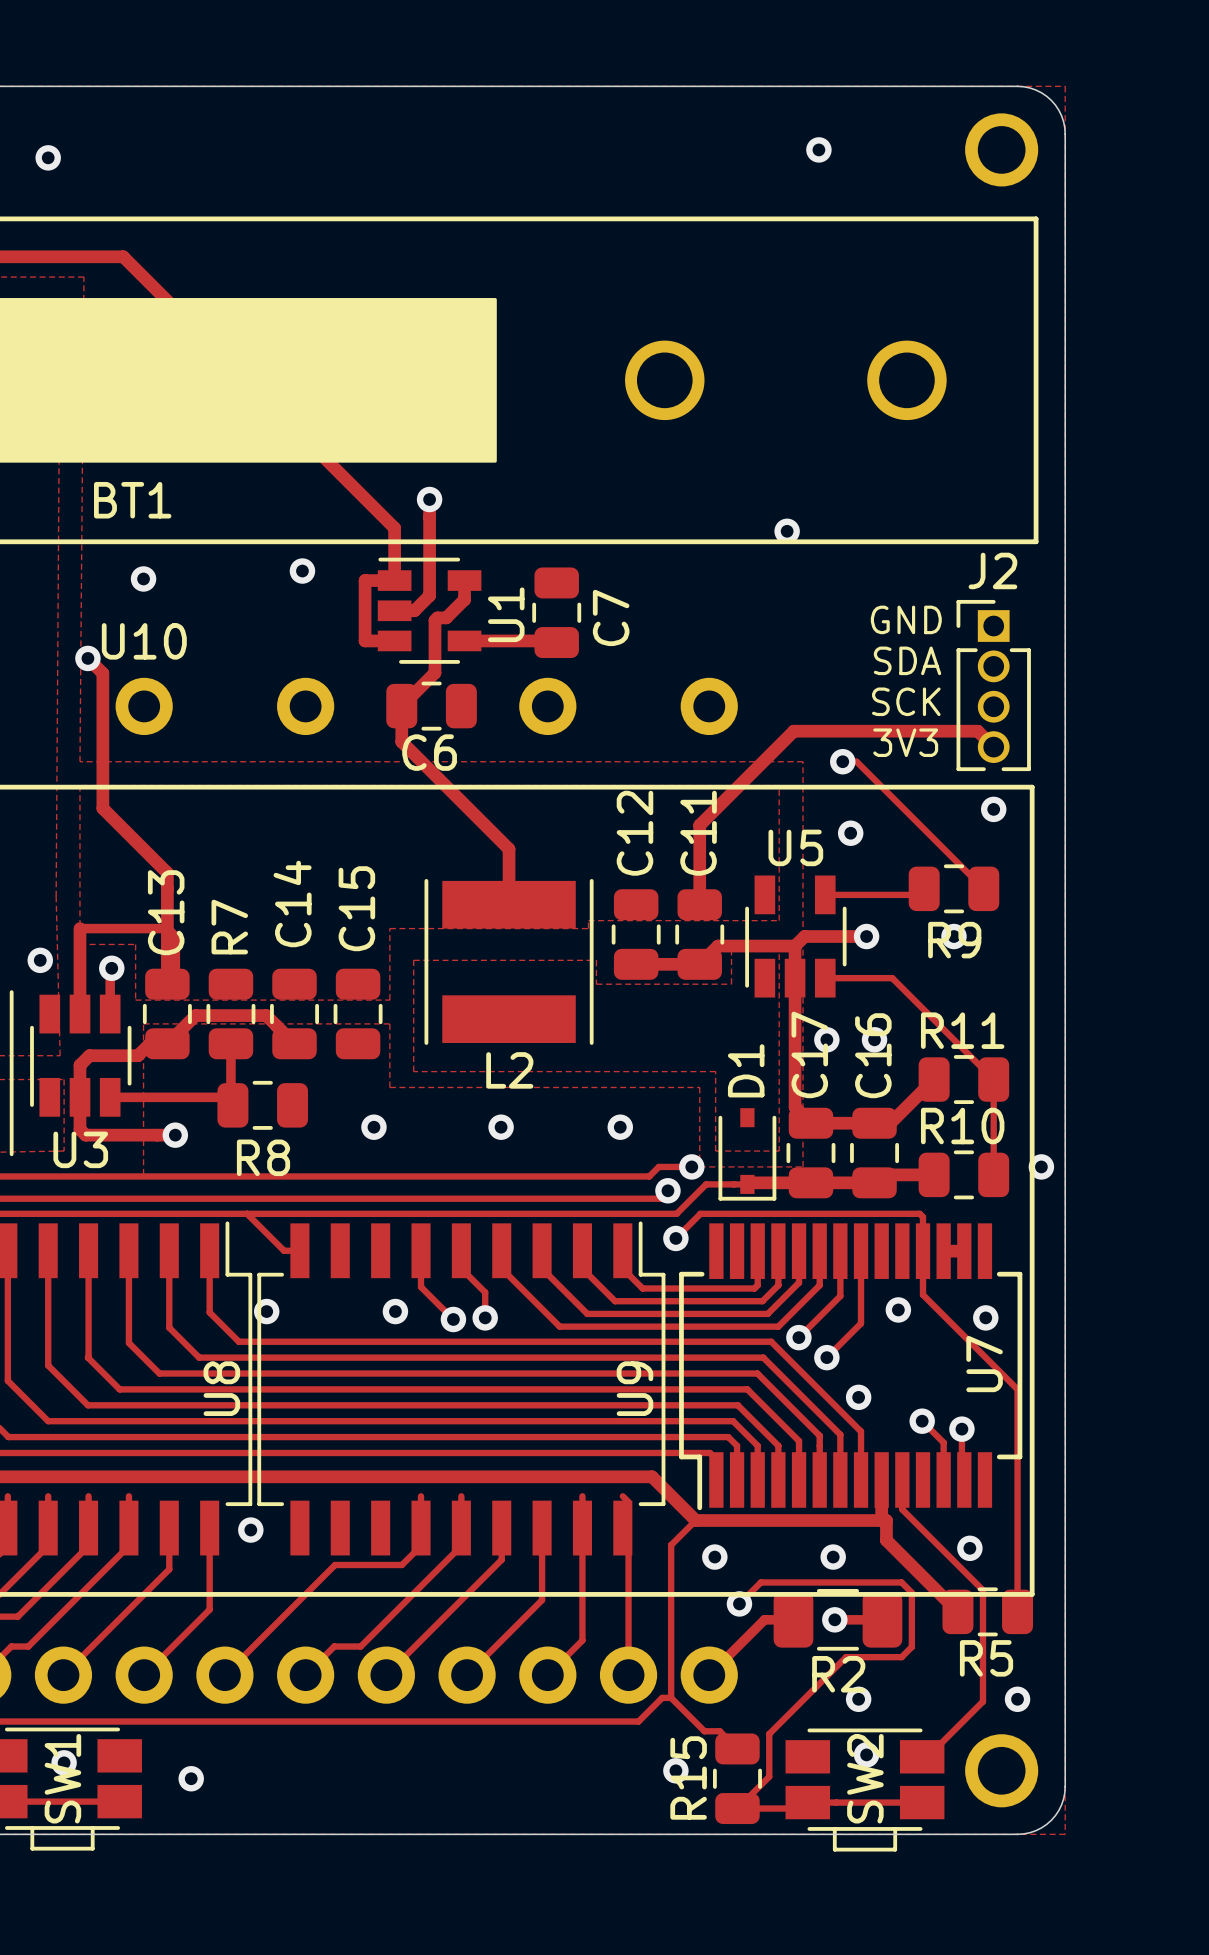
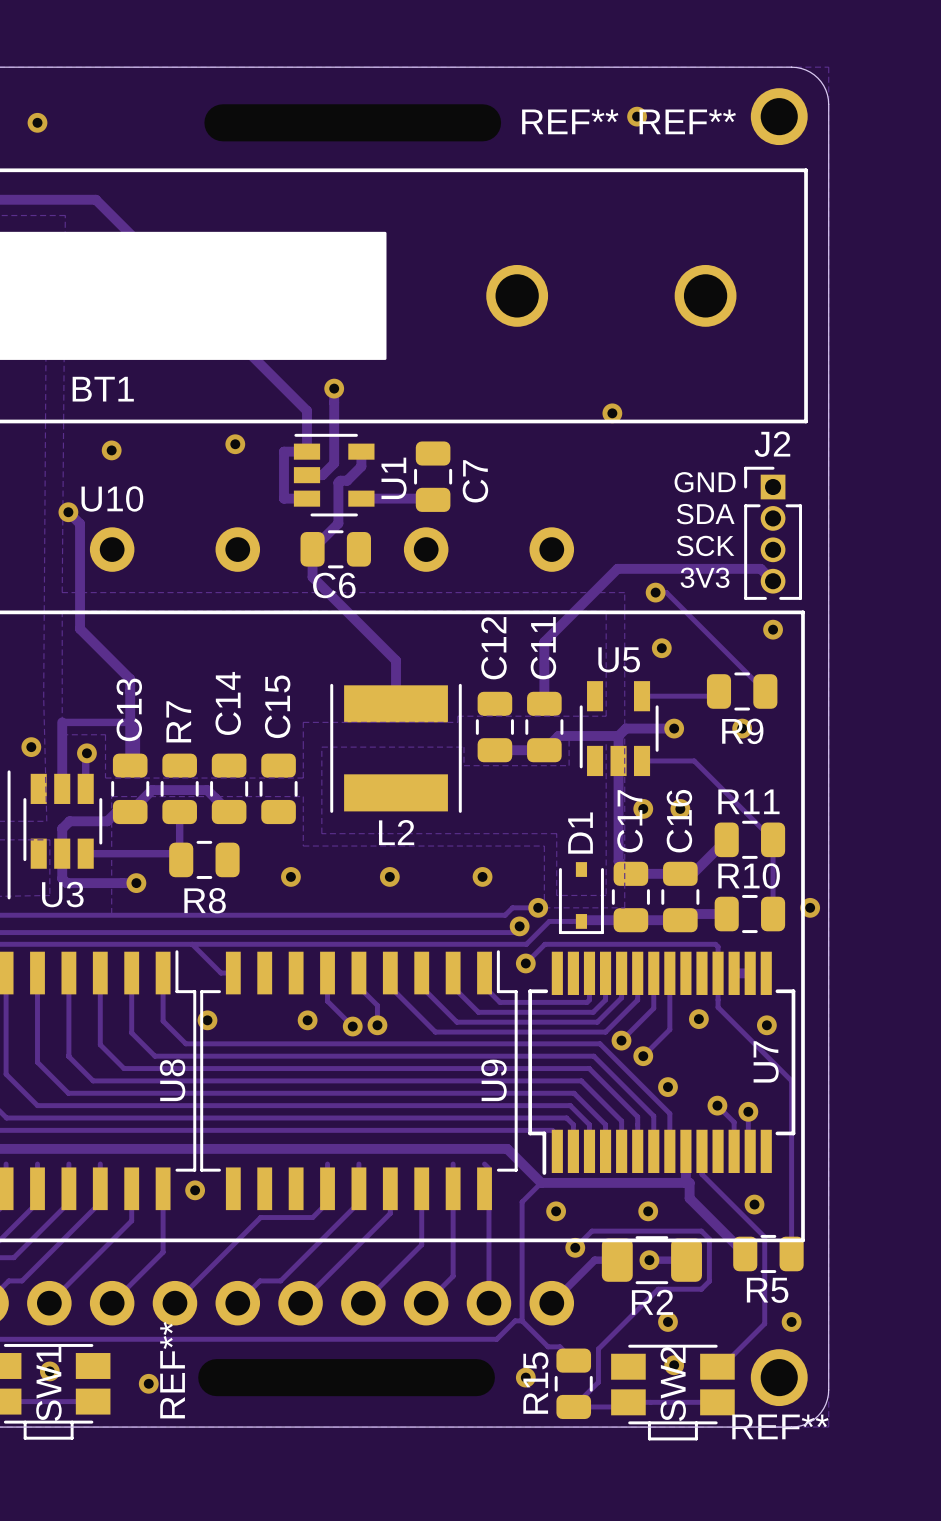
REF** name: none -> REF** (570, 121)
REF** name: none -> REF** (687, 121)
REF** name: none -> REF** (172, 1370)
REF** name: none -> REF** (780, 1426)

